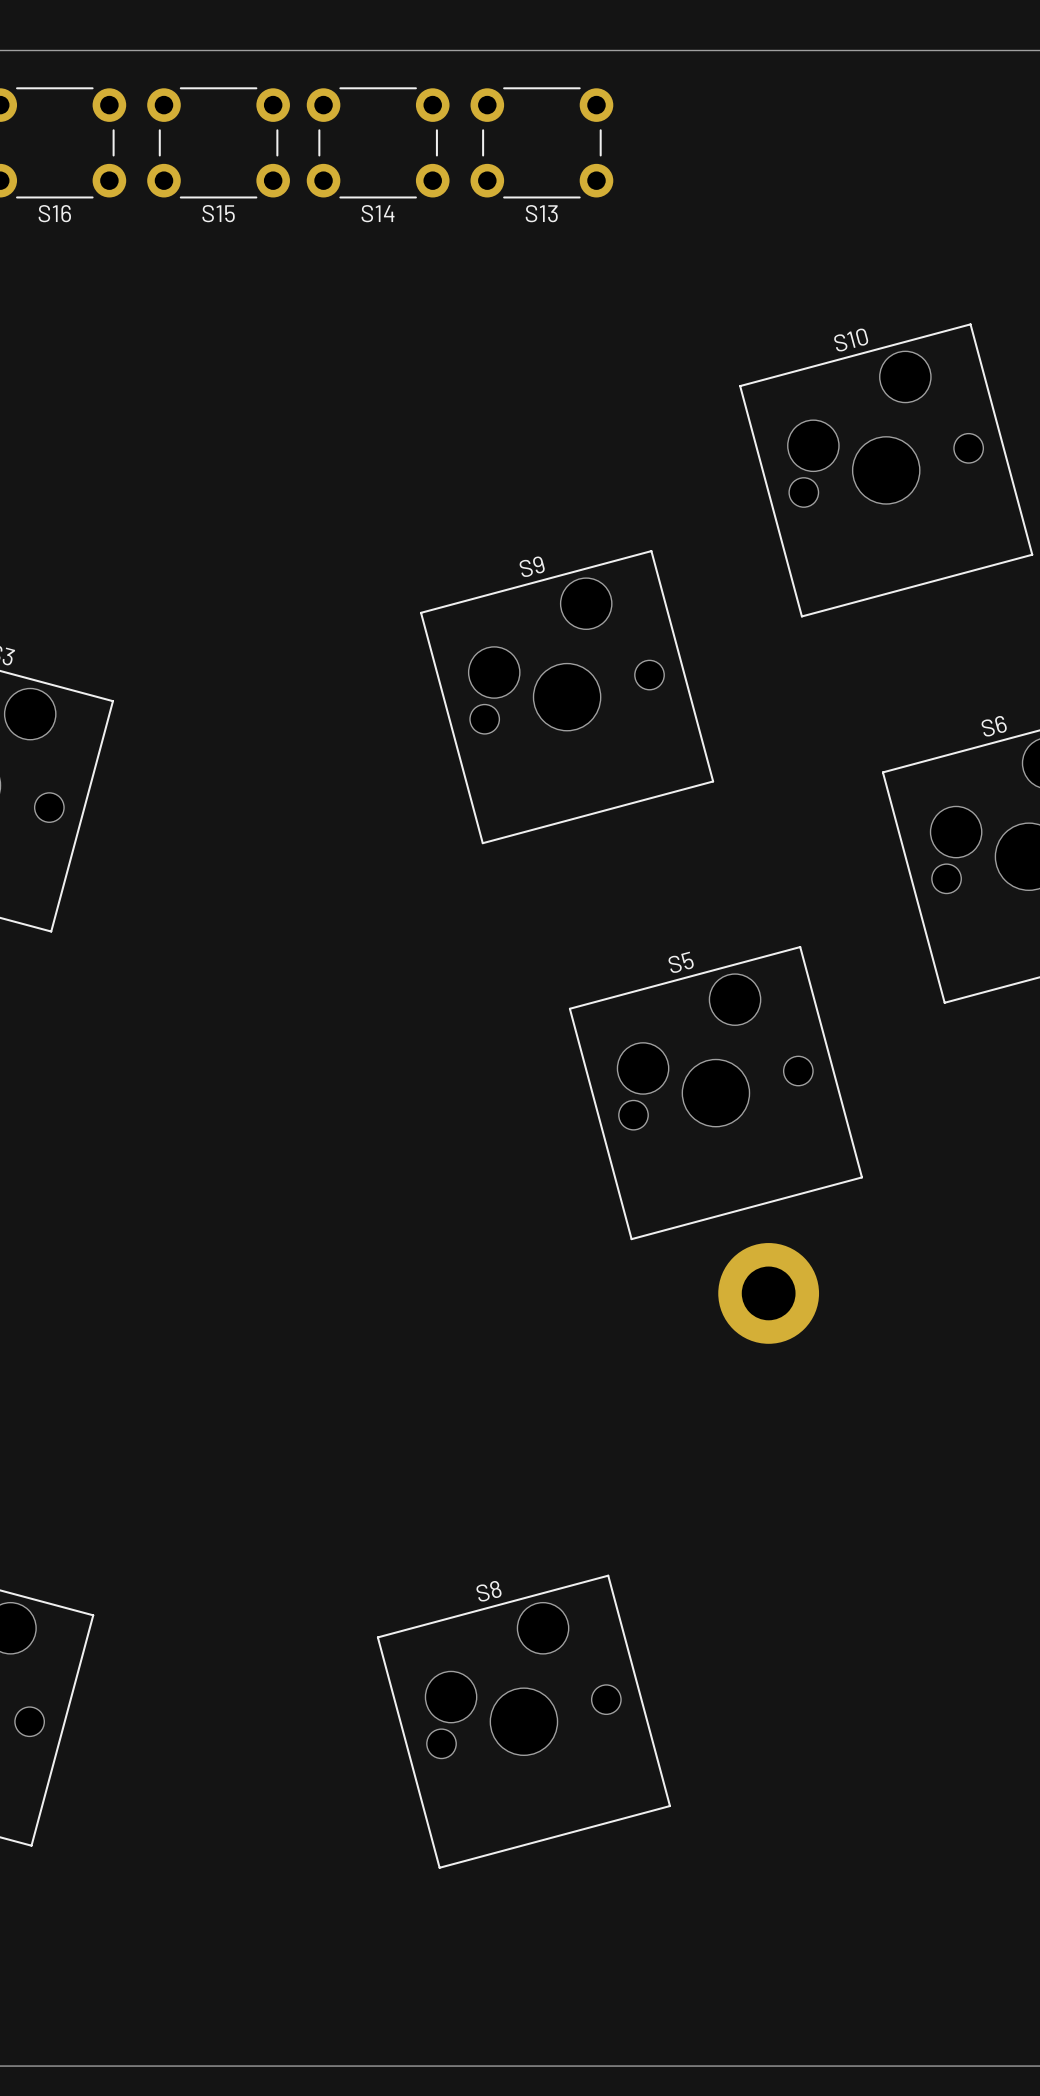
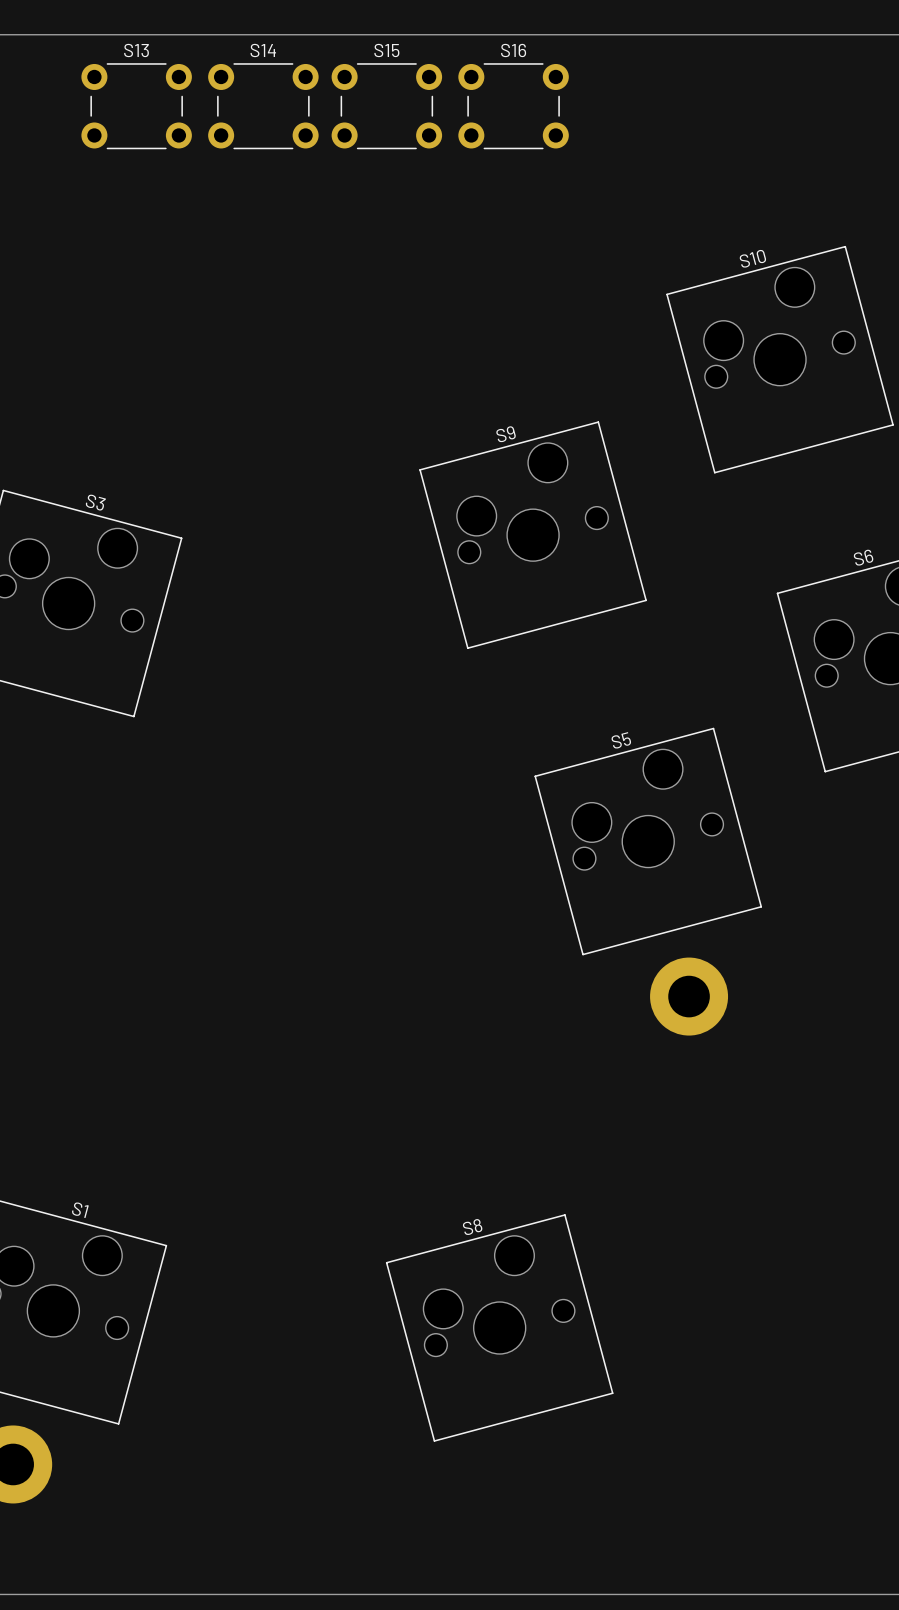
S16 name: S16 (54, 213) -> S13 (136, 50)
S15 name: S15 (218, 213) -> S14 (263, 50)
S14 name: S14 (378, 213) -> S15 (386, 50)
S13 name: S13 (541, 213) -> S16 (513, 50)

